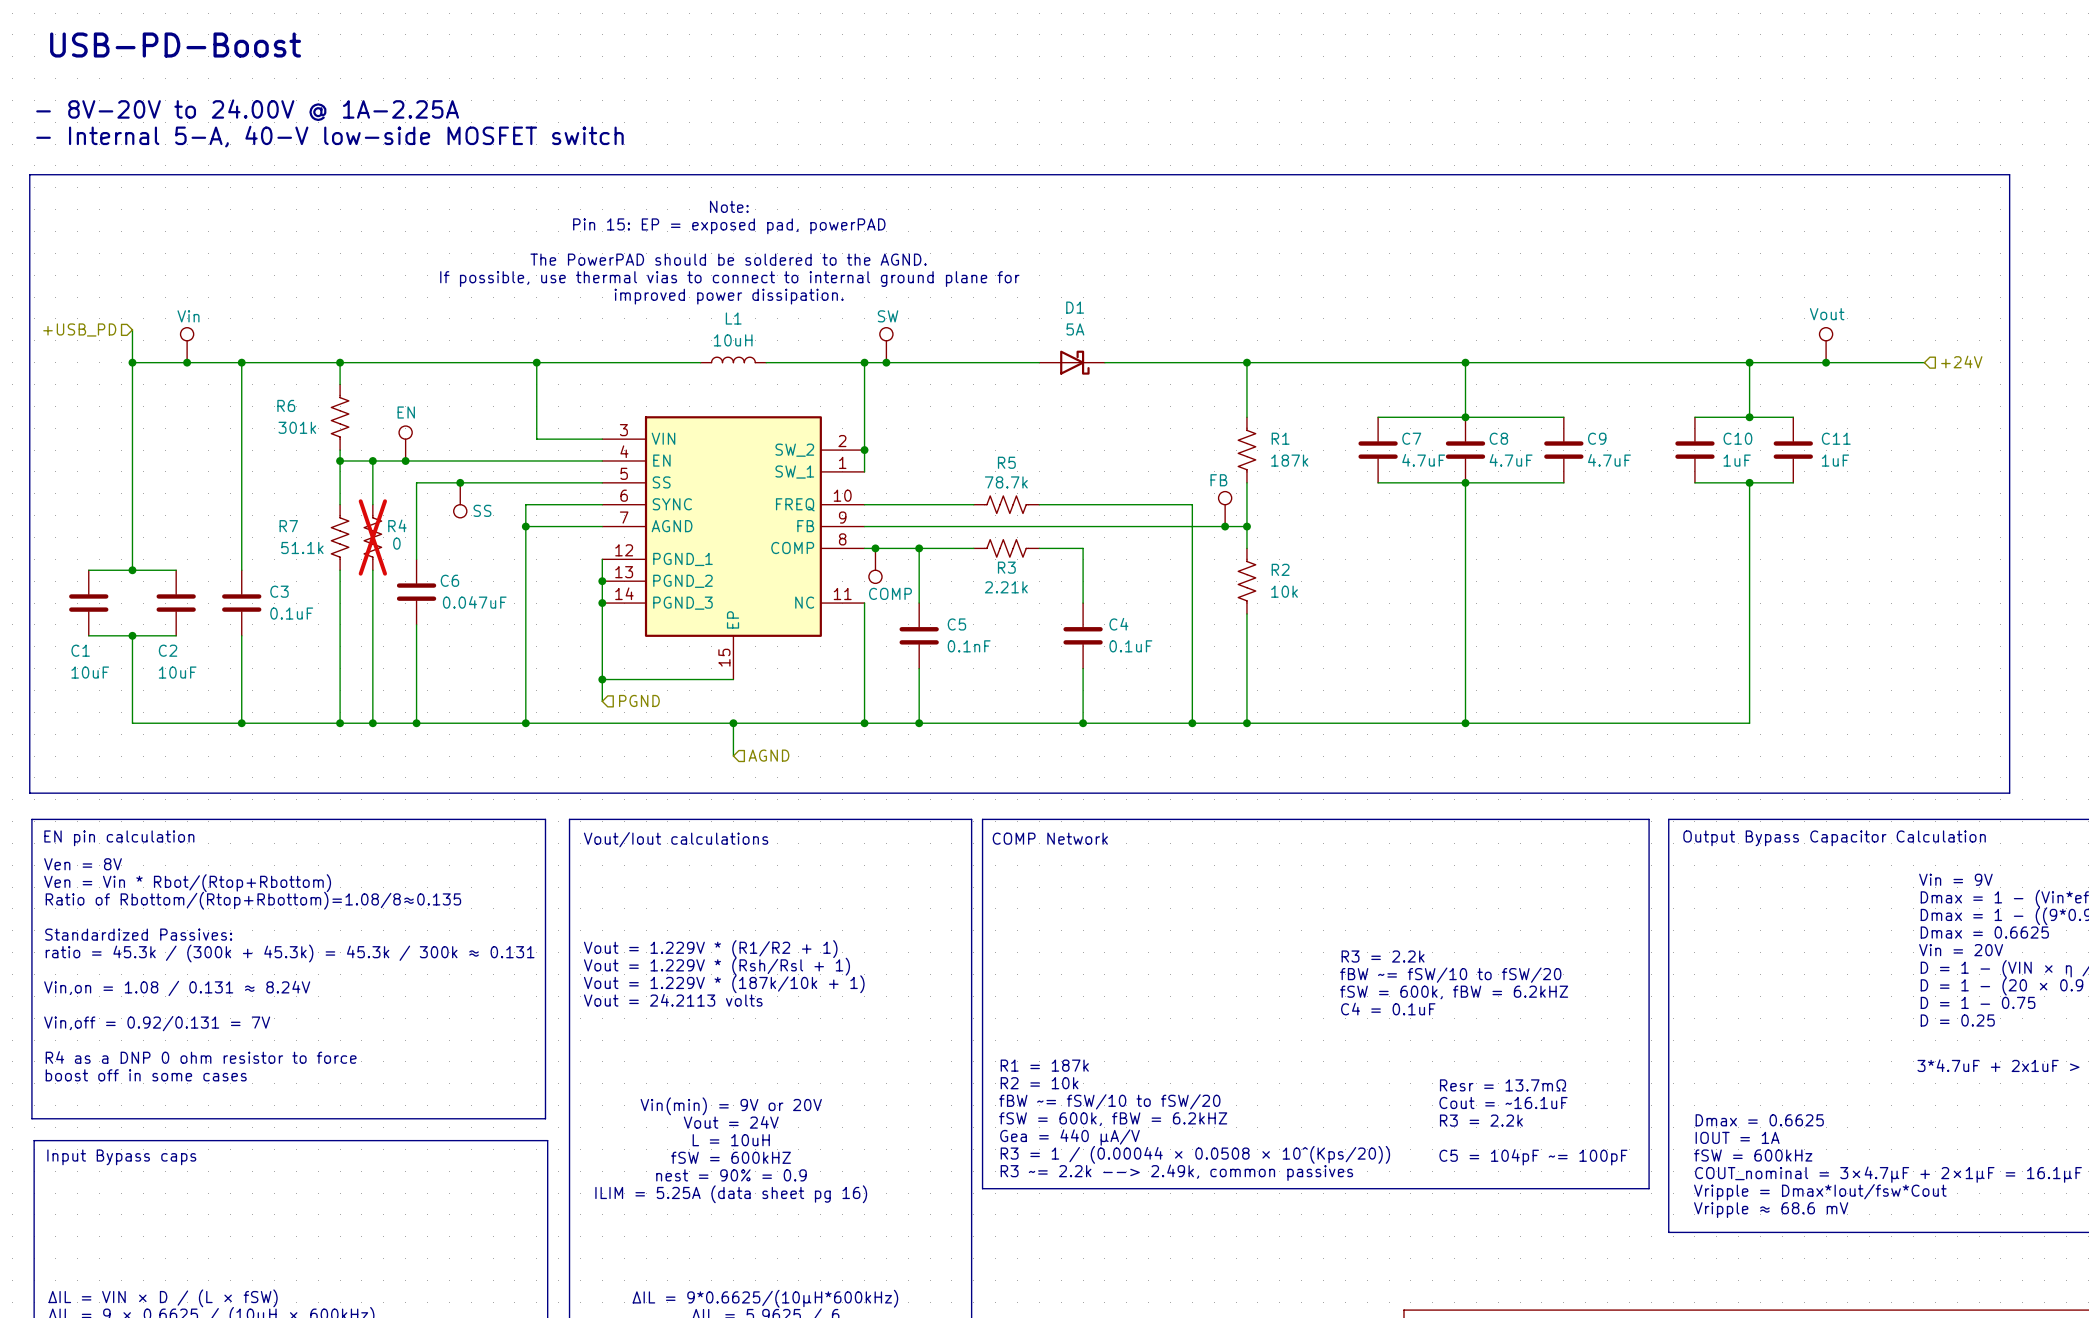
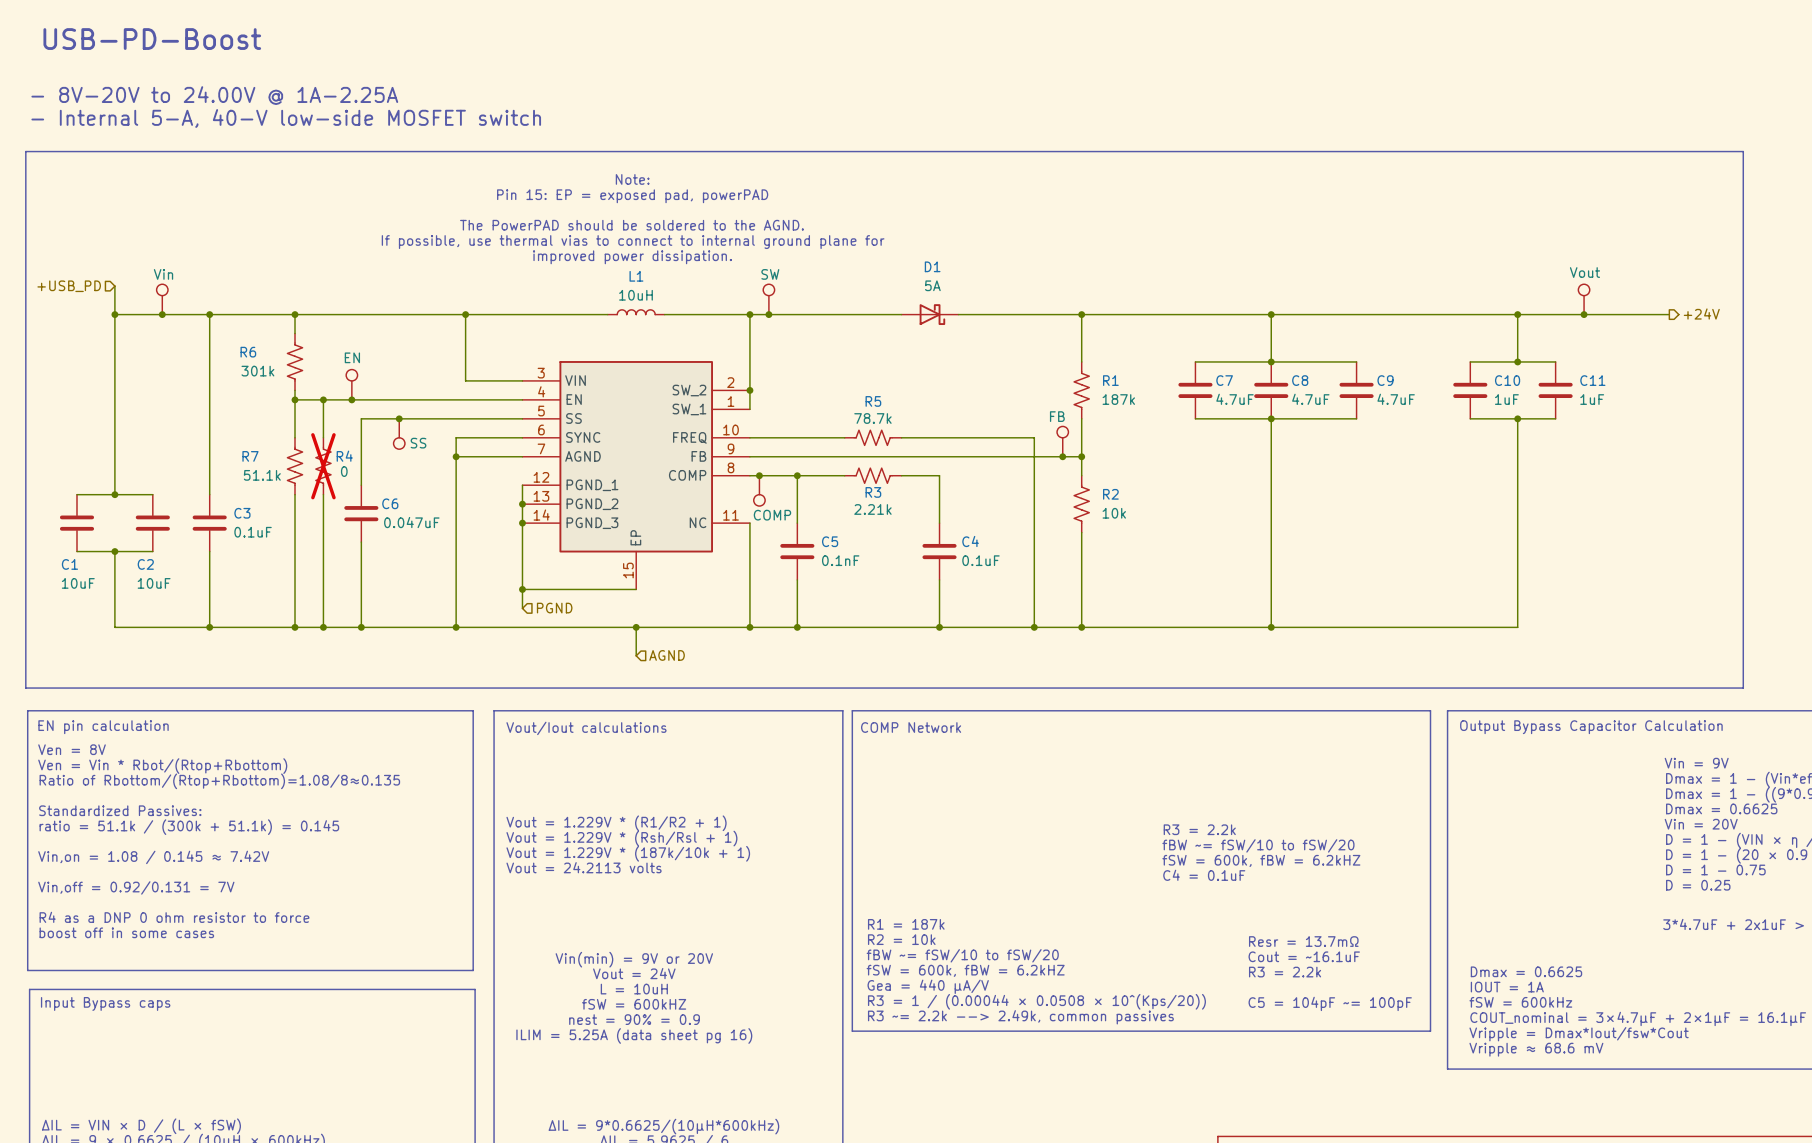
hierarchical label shape: input (1961, 361) -> output (1701, 314)
text: ratio = 45.3k / (300k + 45.3k) = 45.3k / 300k ≈ 0.131 (290, 953) -> ratio = 51.1k / (300k + 51.1k) = 0.145 (189, 827)
text: Vin,on = 1.08 / 0.131 ≈ 8.24V (177, 988) -> Vin,on = 1.08 / 0.145 ≈ 7.42V (153, 857)

